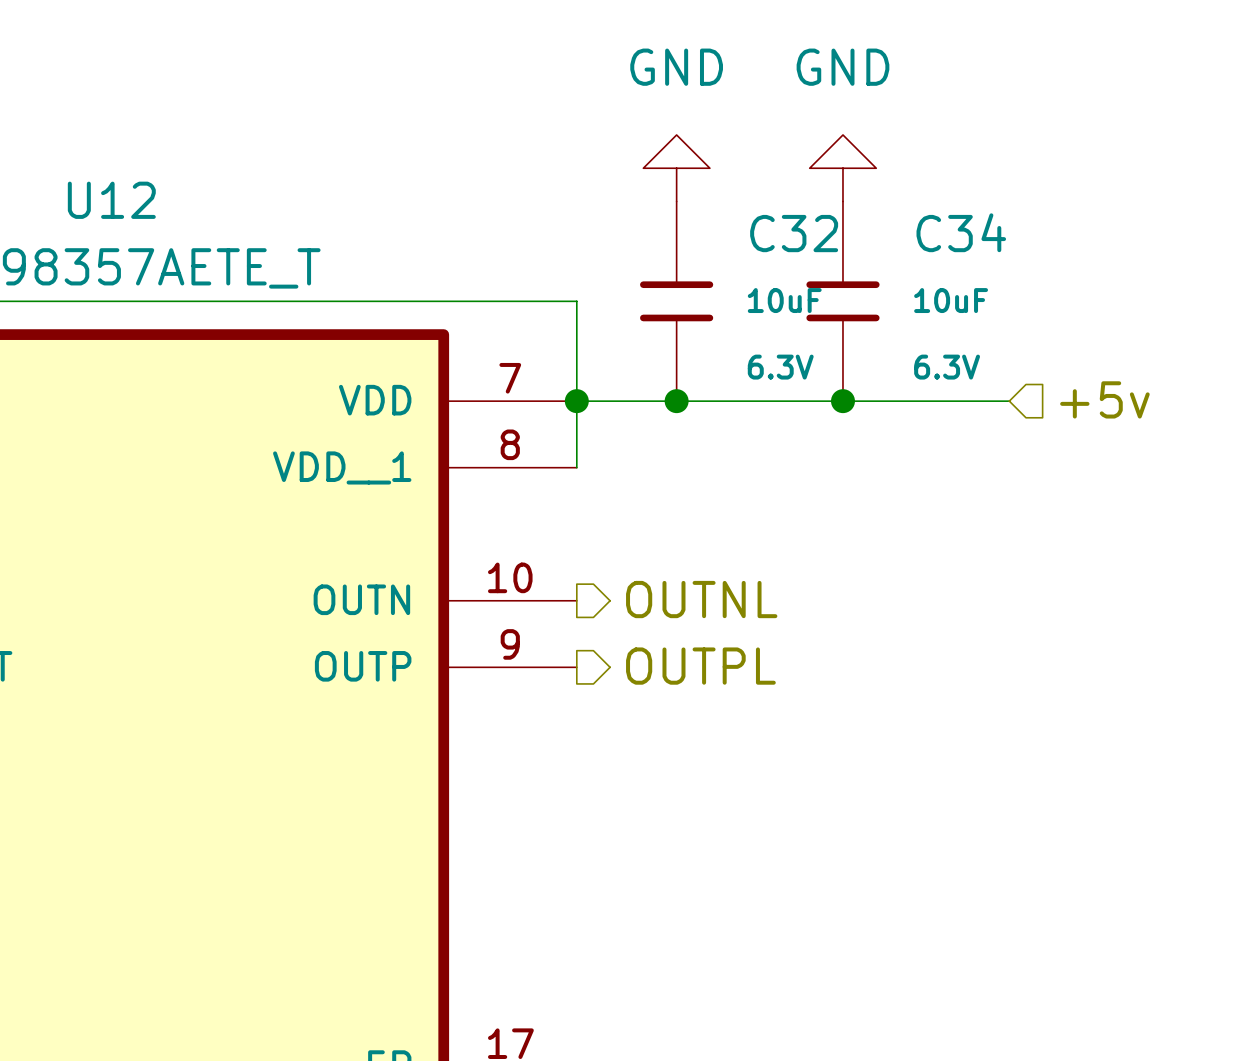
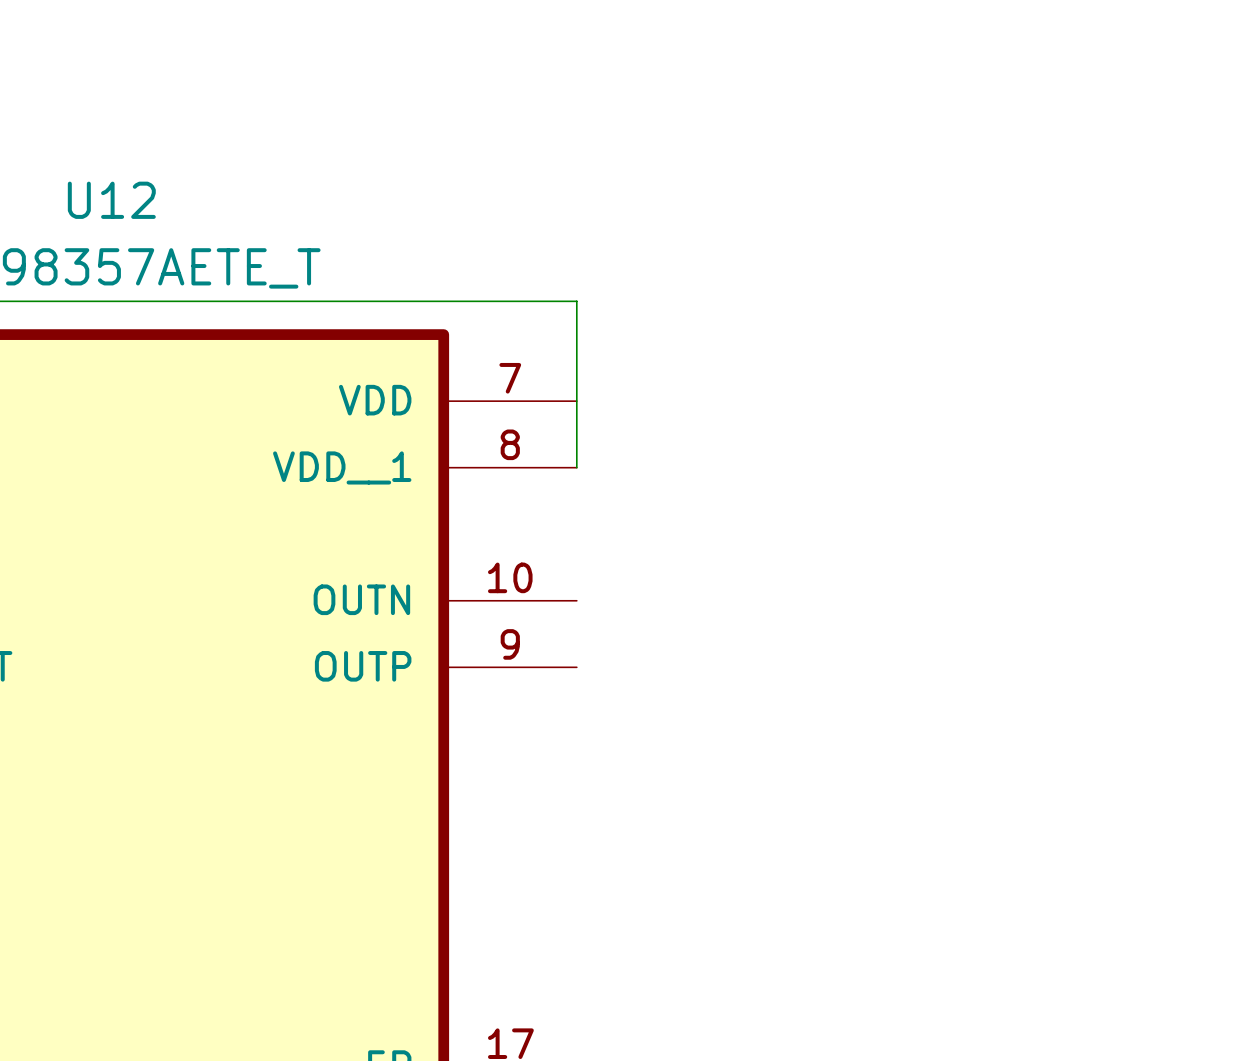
power symbol: GND (676, 168) -> none
power symbol: GND (842, 168) -> none
C32: 10uF (676, 301) -> none
C34: 10uF (842, 301) -> none
hierarchical label: +5v (1104, 399) -> none
wire: (576, 401) (1009, 401) -> none
junction: (576, 401) -> none
junction: (676, 401) -> none
junction: (842, 401) -> none
hierarchical label: OUTNL (701, 599) -> none
hierarchical label: OUTPL (700, 666) -> none

